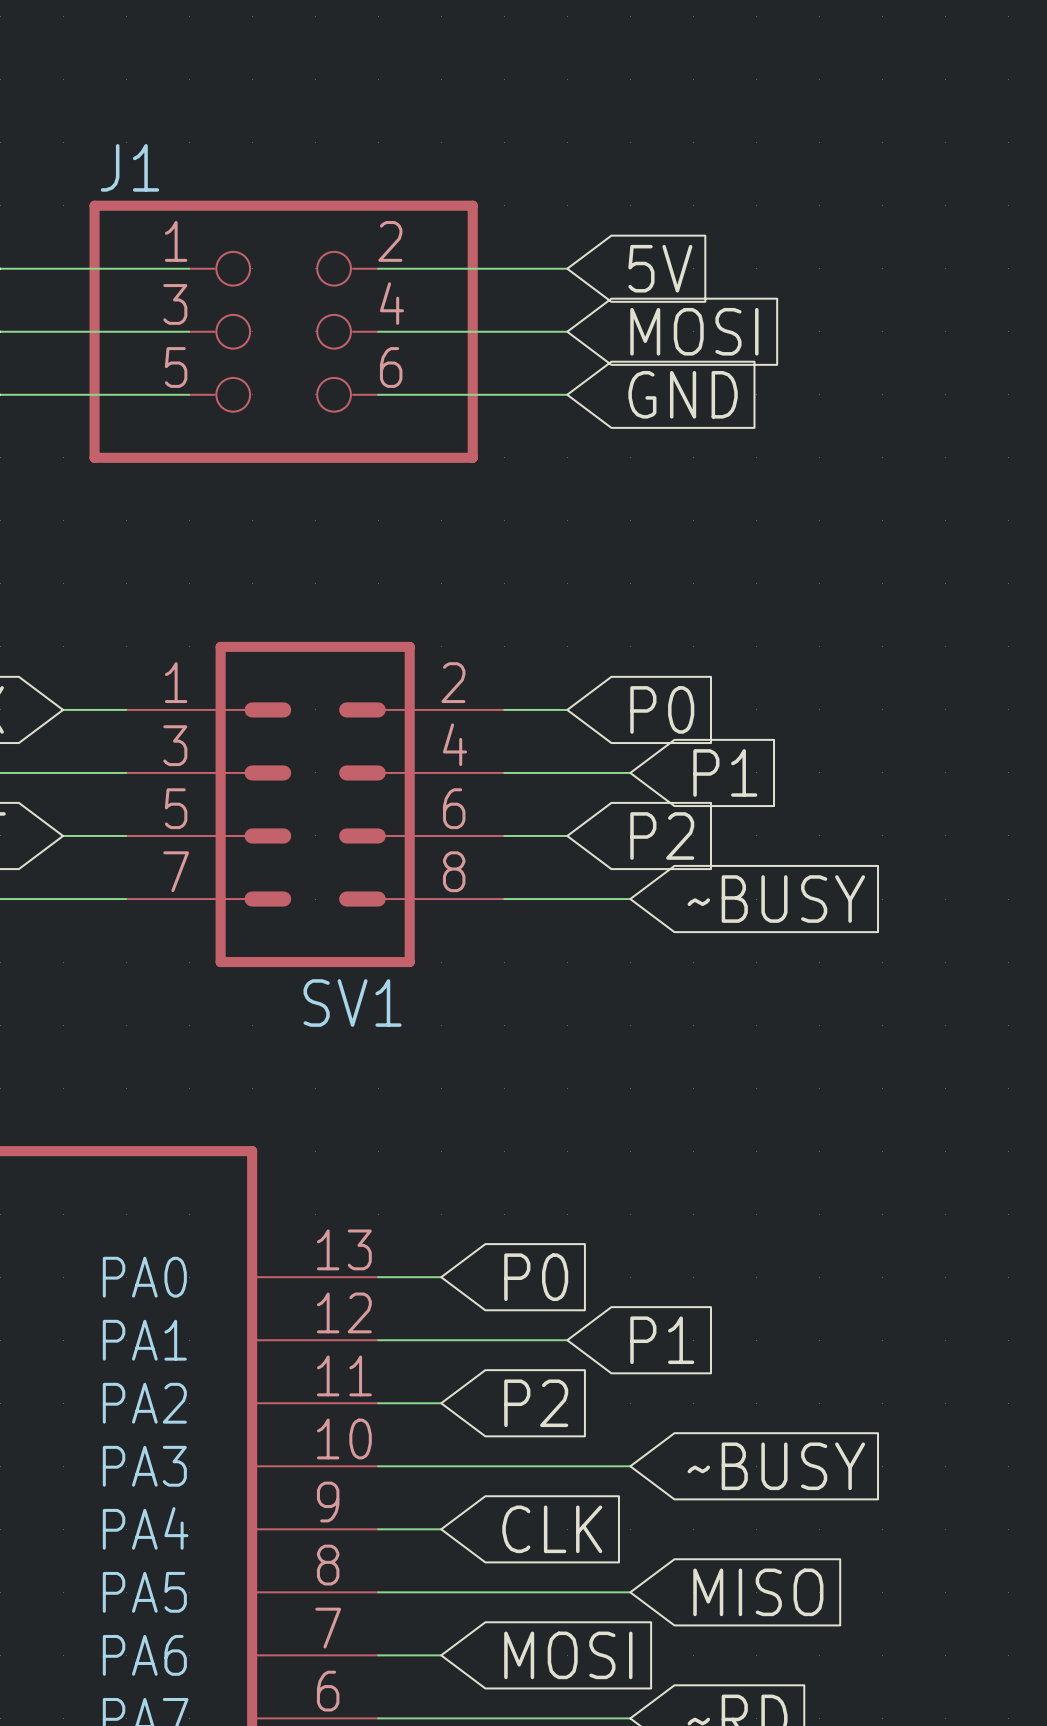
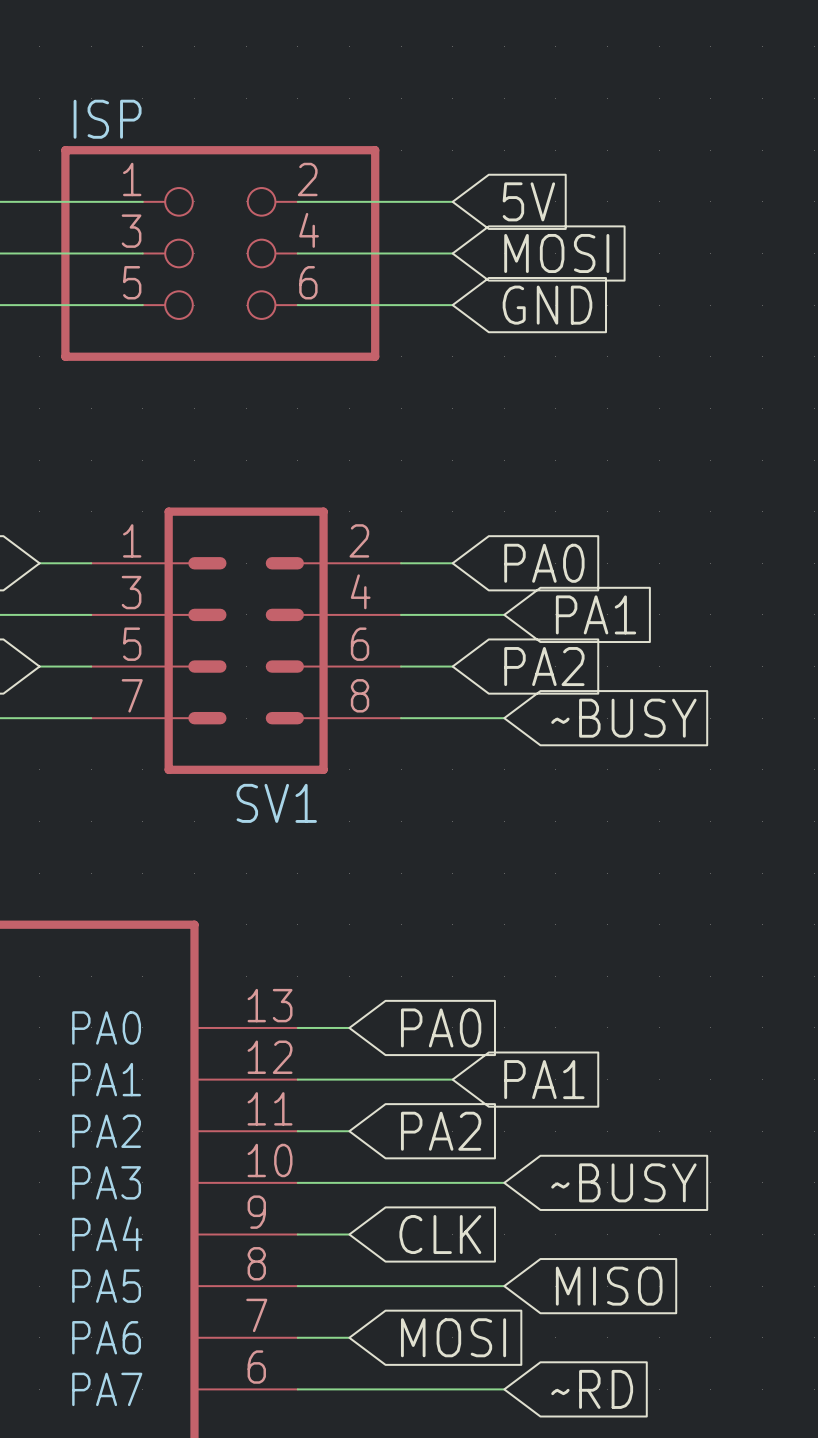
J1 name: J1 (129, 167) -> ISP (107, 119)
global label: P0 (662, 709) -> PA0 (544, 563)
global label: P1 (725, 772) -> PA1 (596, 614)
global label: P2 (662, 835) -> PA2 (544, 666)
global label: P0 (536, 1277) -> PA0 (441, 1027)
global label: P1 (662, 1340) -> PA1 (544, 1079)
global label: P2 (536, 1403) -> PA2 (441, 1131)

